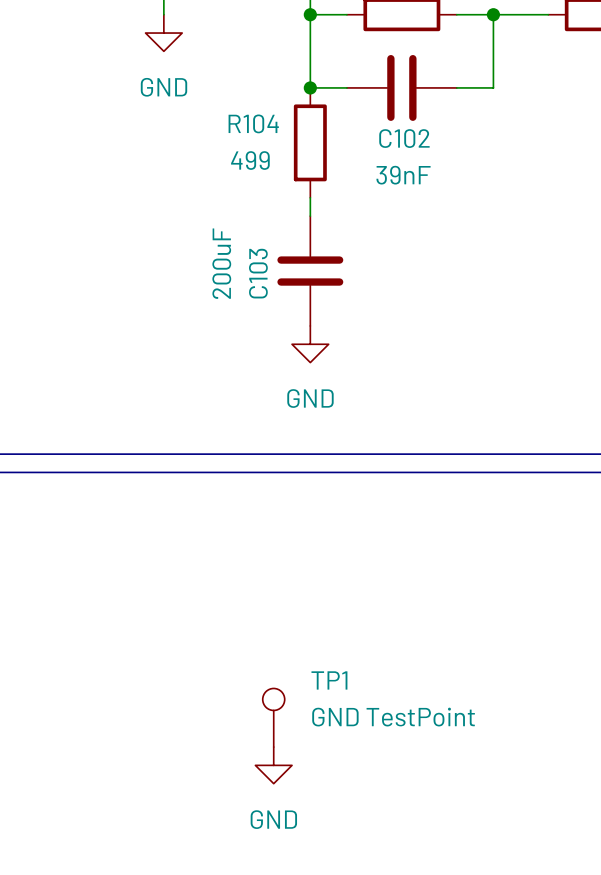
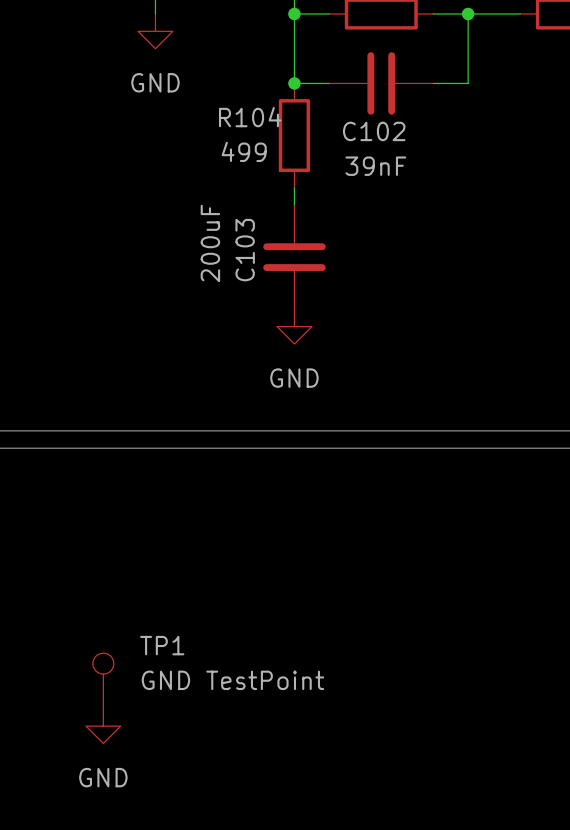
TP1 position: (273, 717) -> (103, 680)
power symbol position: GND (273, 765) -> GND (103, 726)

